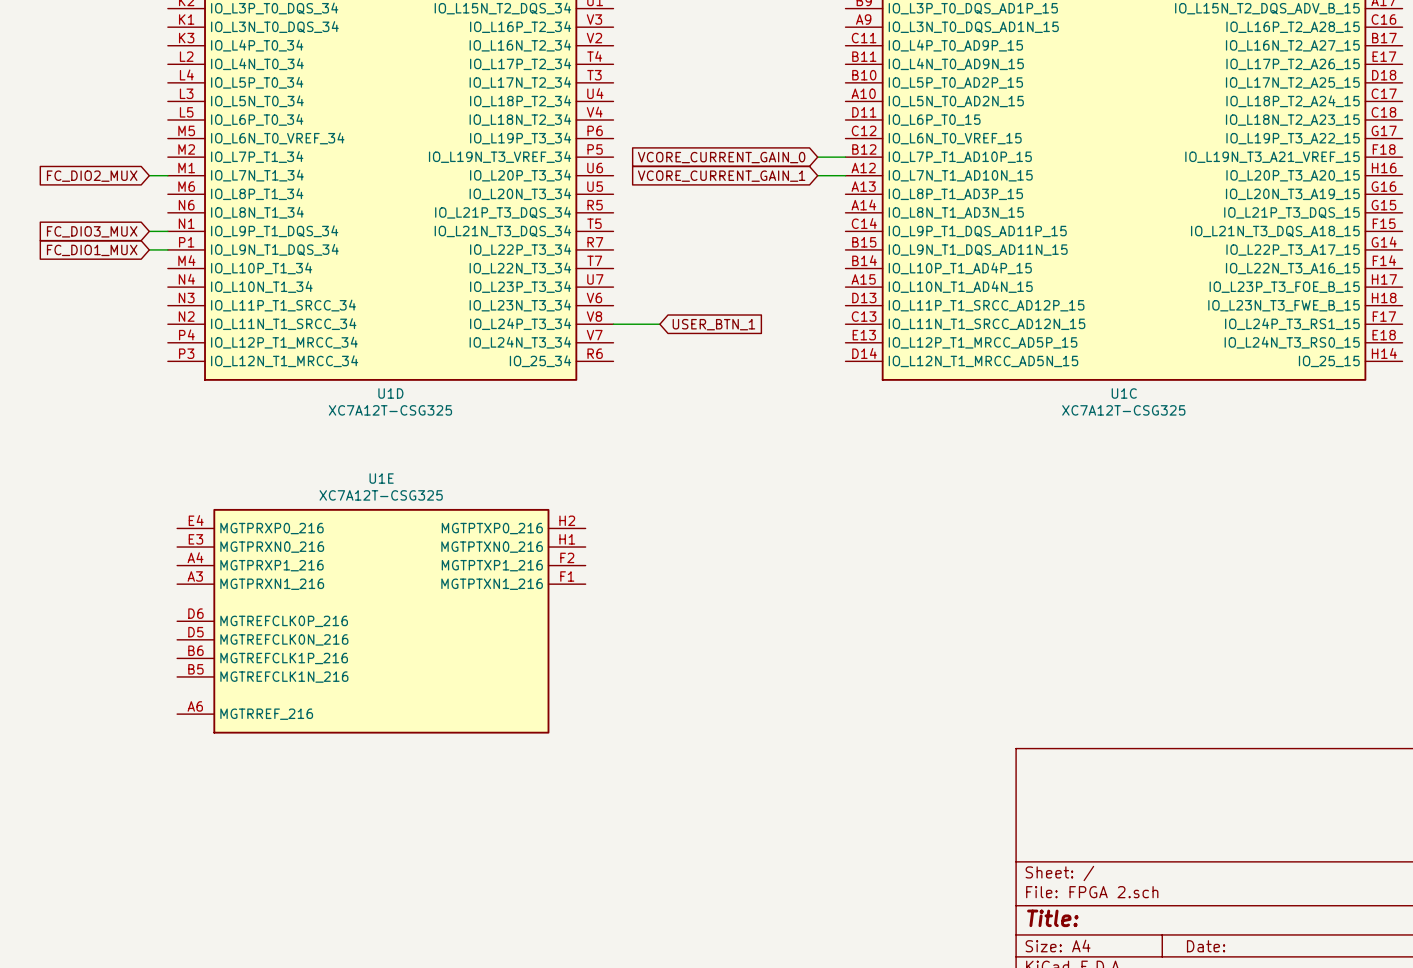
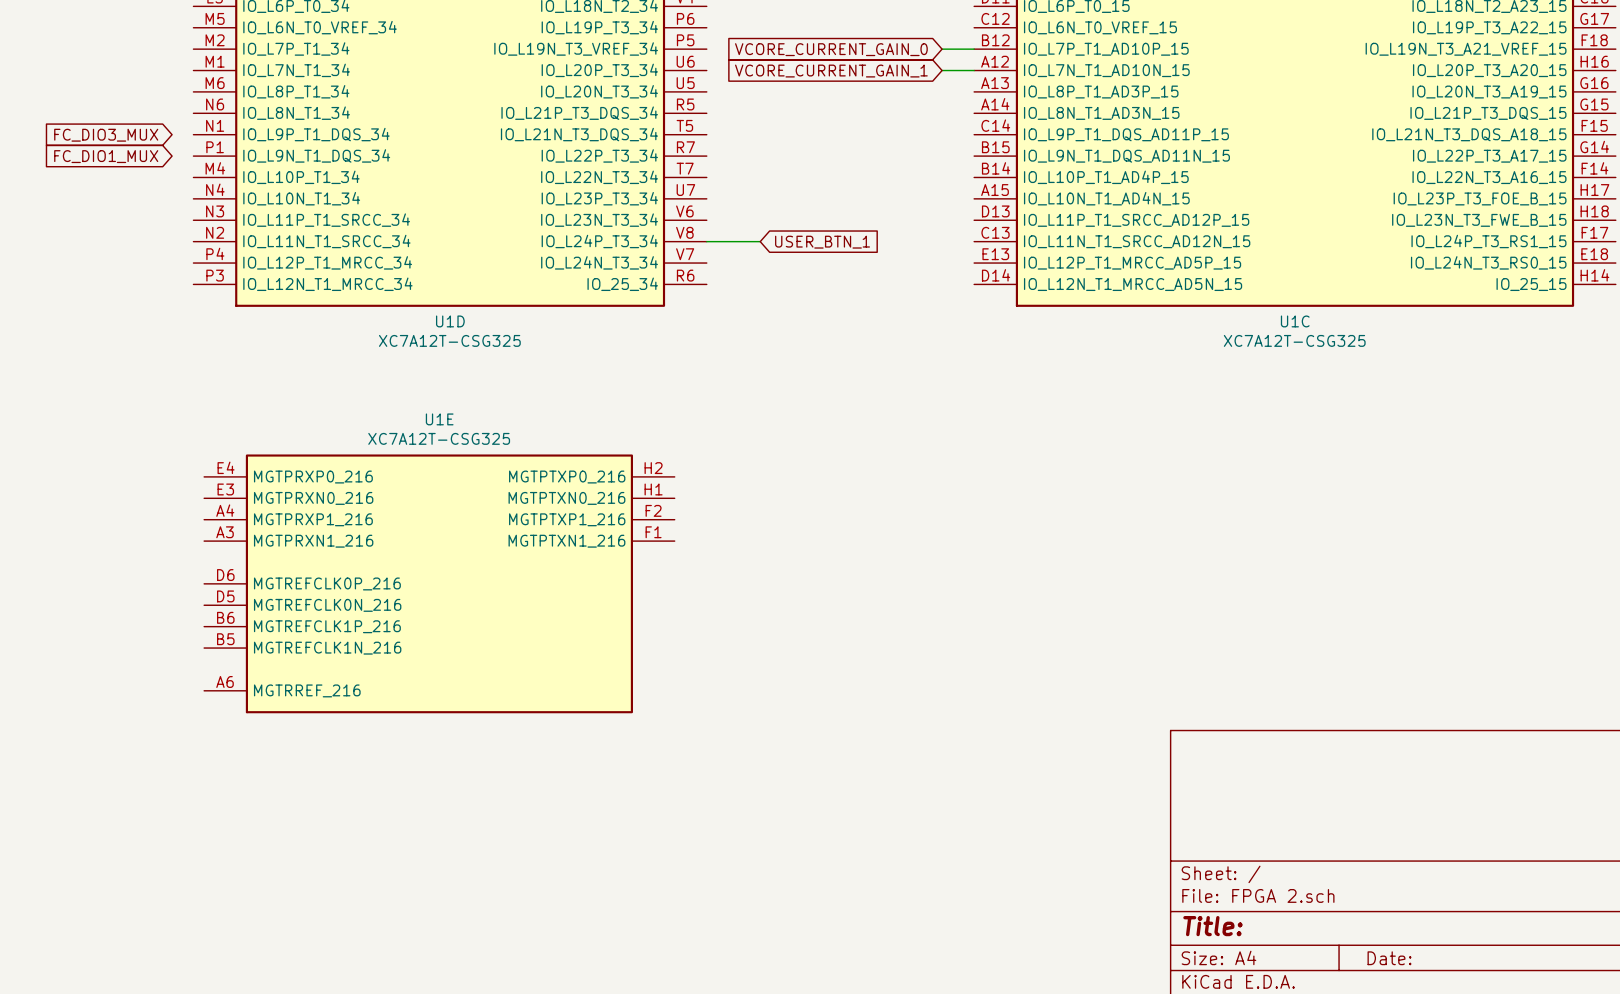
wire: (149, 175) (167, 175) -> none
global label: FC_DIO2_MUX (92, 176) -> none
wire: (149, 231) (167, 231) -> none
wire: (149, 249) (167, 249) -> none

